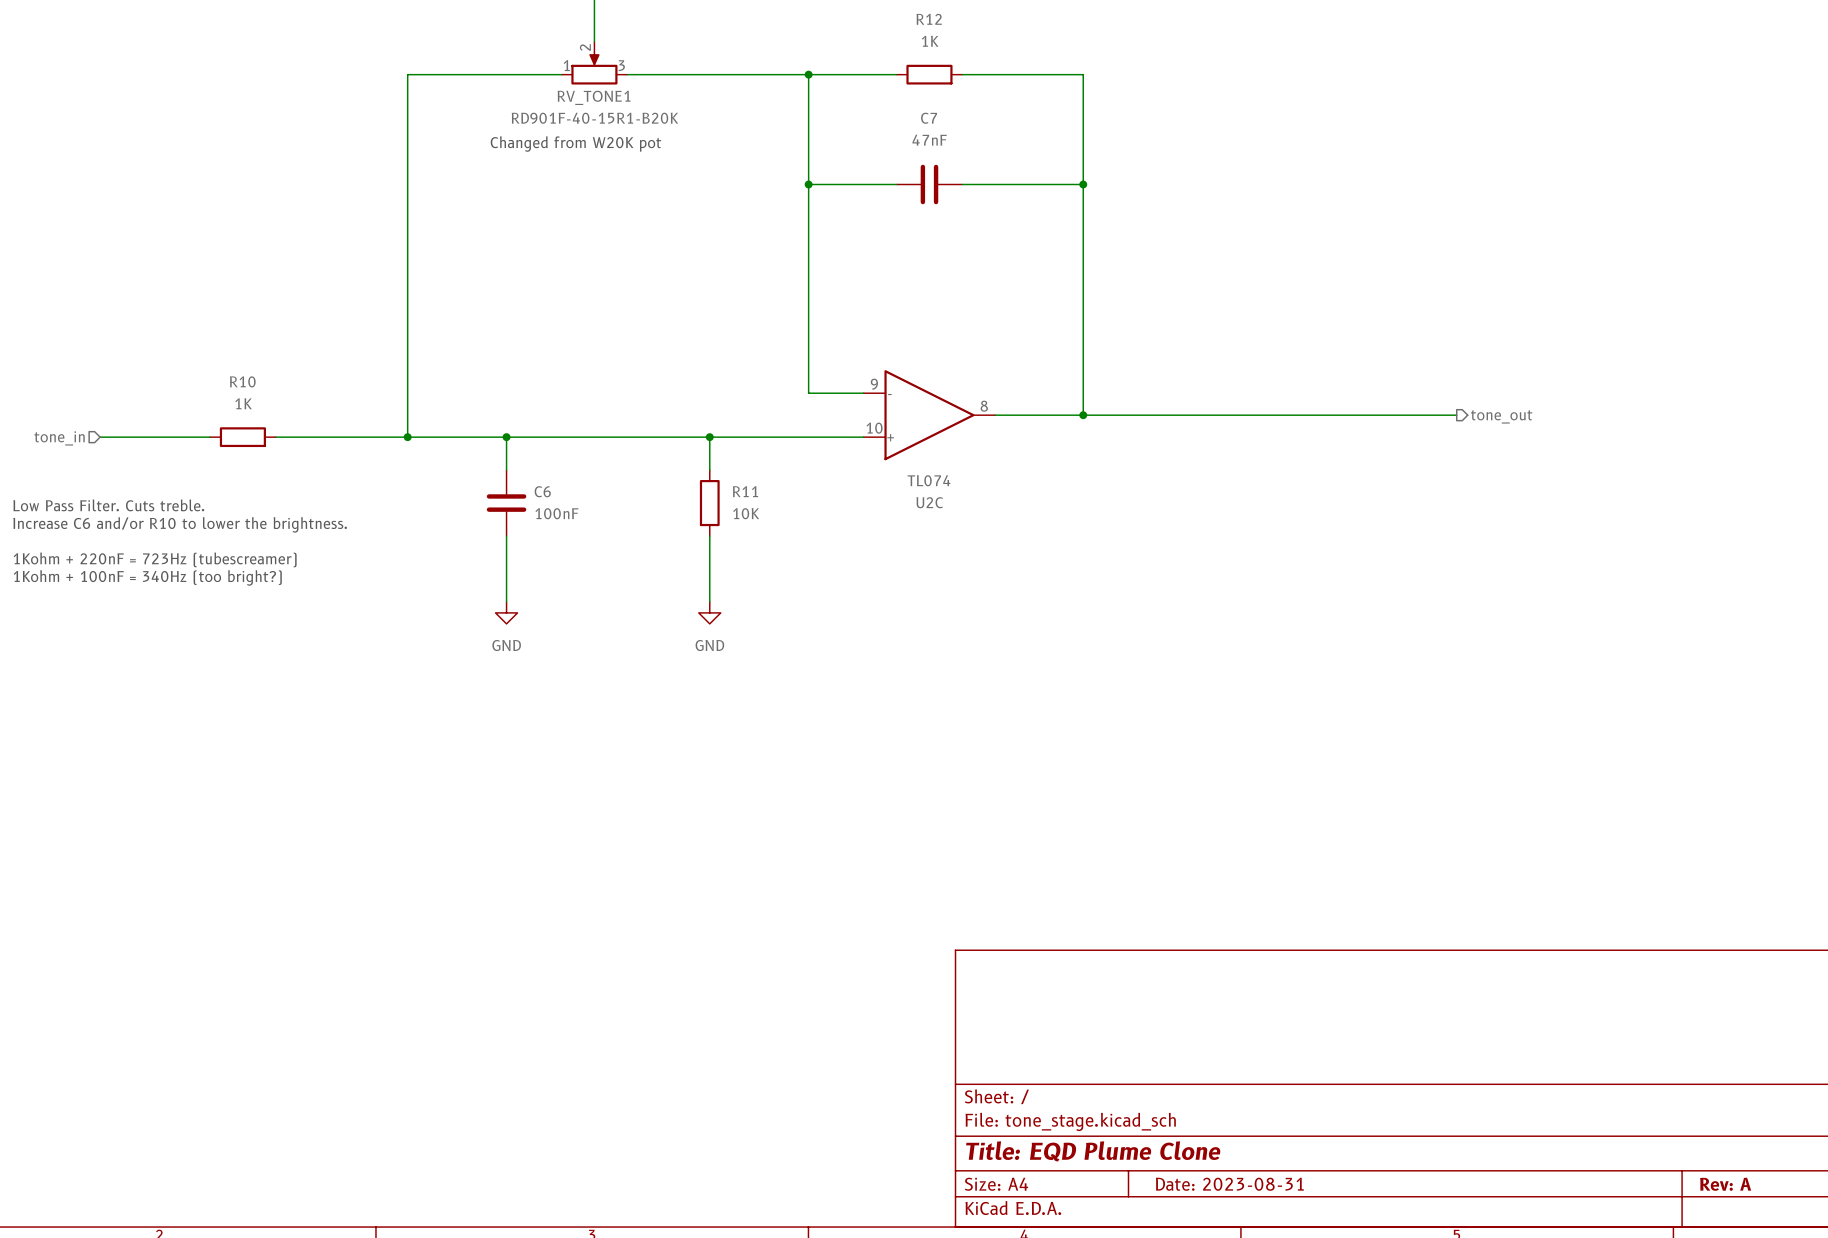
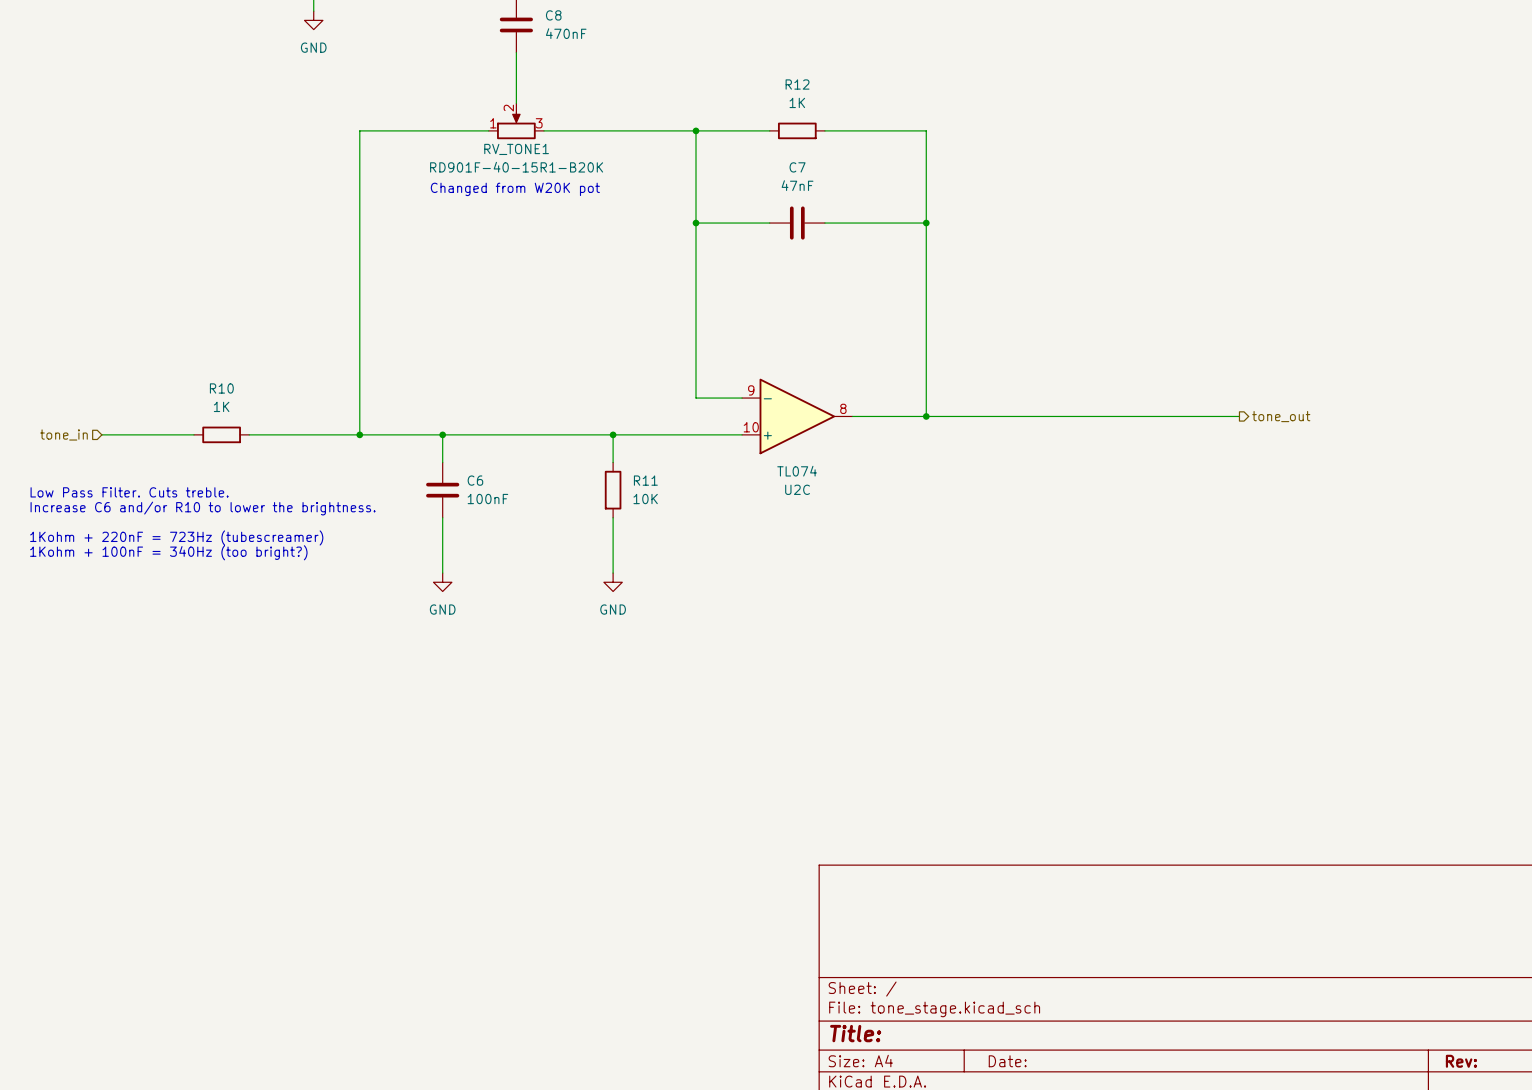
title block: Title: EQD Plume Clone (1093, 1151) -> Title: (855, 1033)
title block: Date: 2023-08-31 (1229, 1184) -> Date: (1007, 1061)
title block: Rev: A (1725, 1184) -> Rev: (1461, 1061)

